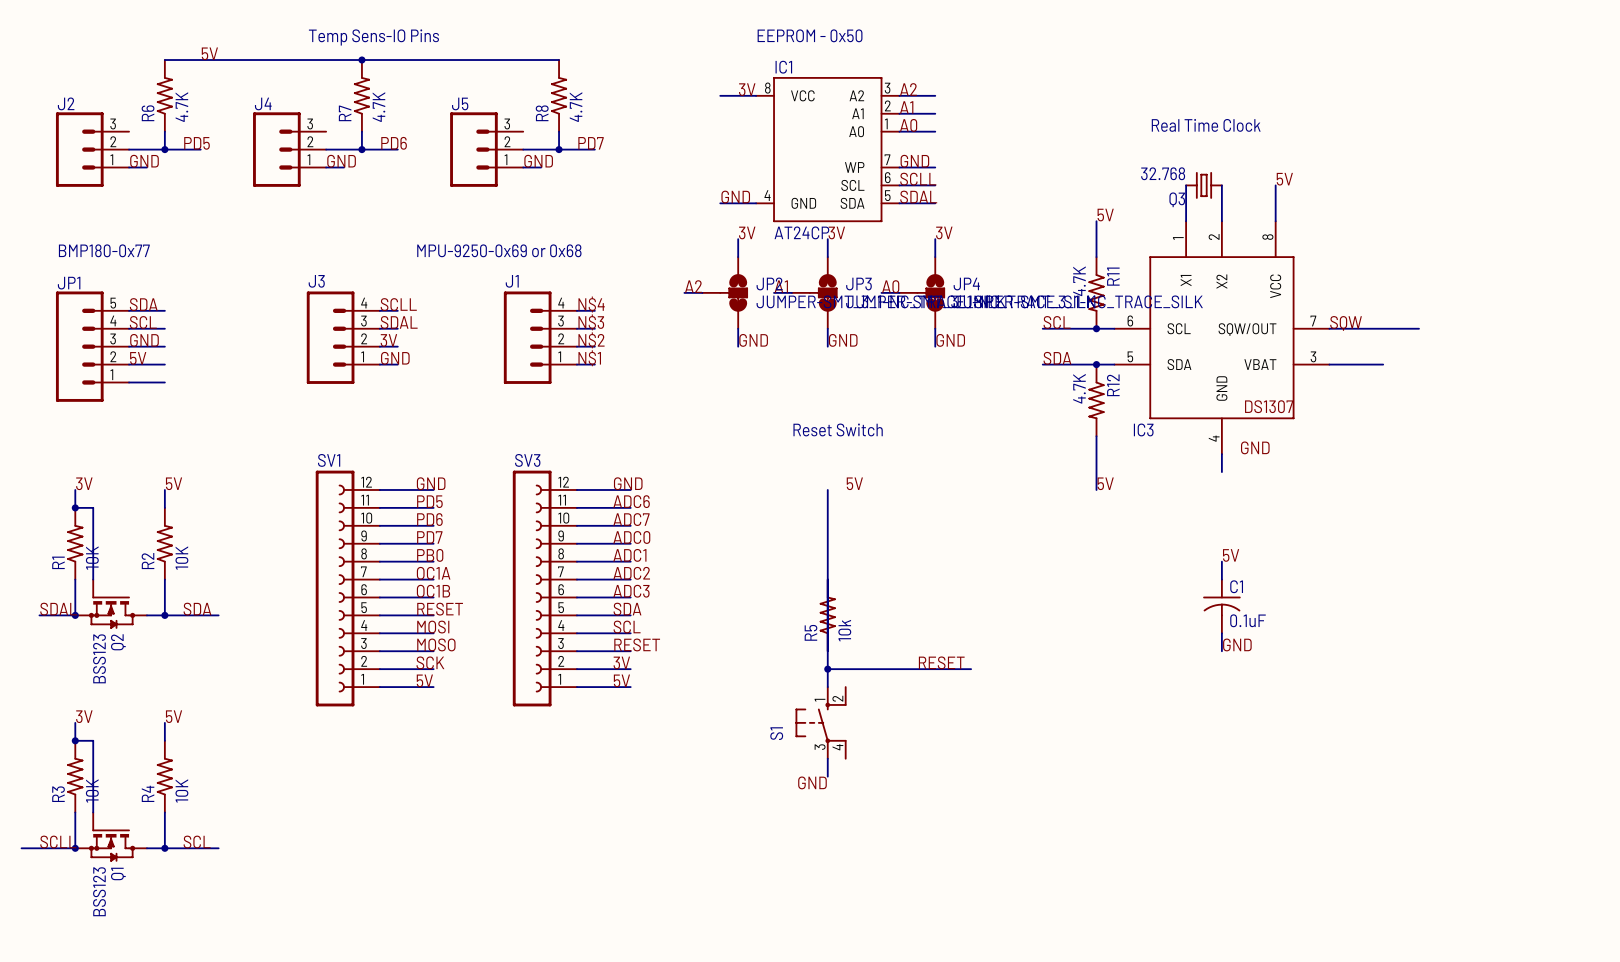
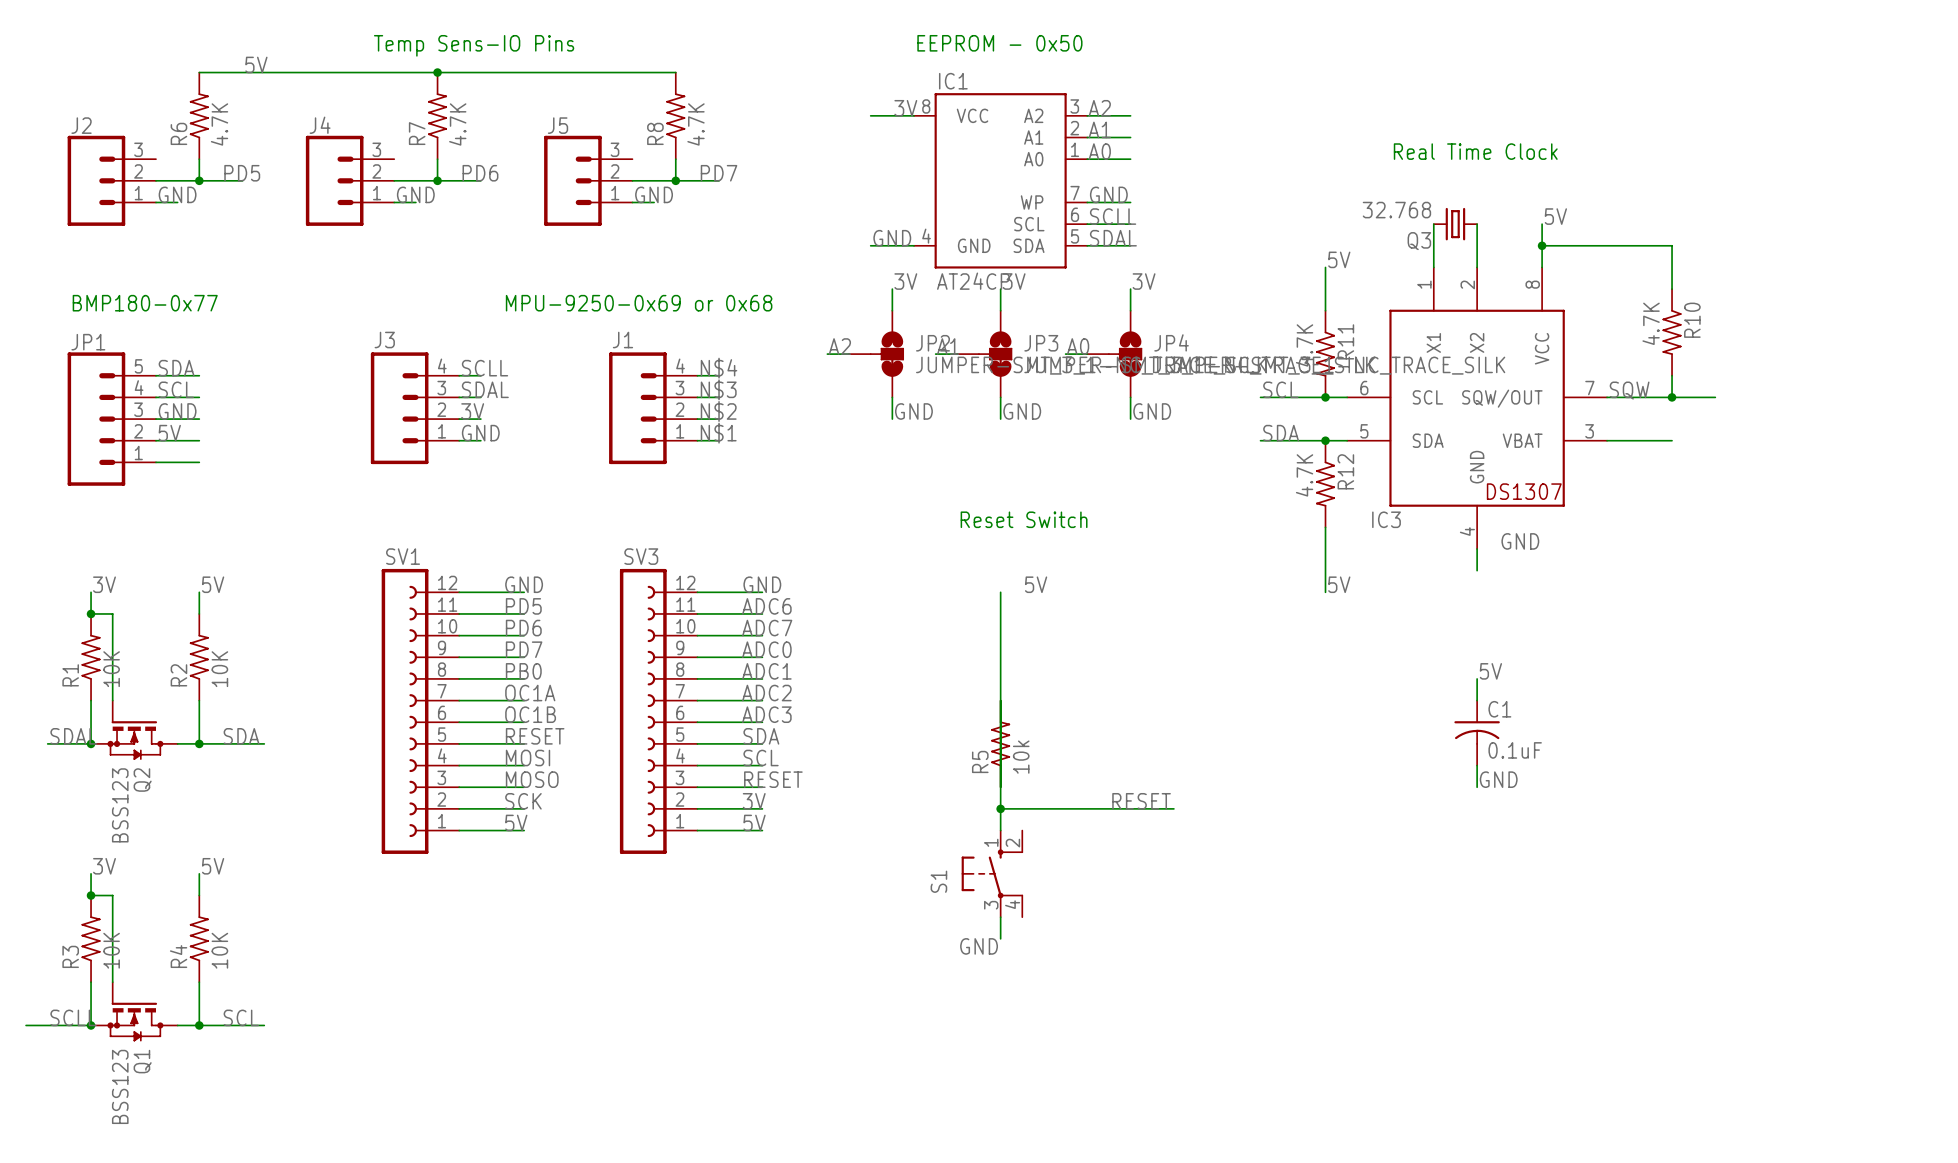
wire: none -> (1542, 245) (1672, 245) (1672, 289)
junction: none -> (1542, 245)
R10: none -> 4.7K (1672, 332)
wire: none -> (1672, 375) (1672, 397)
junction: none -> (1672, 397)

